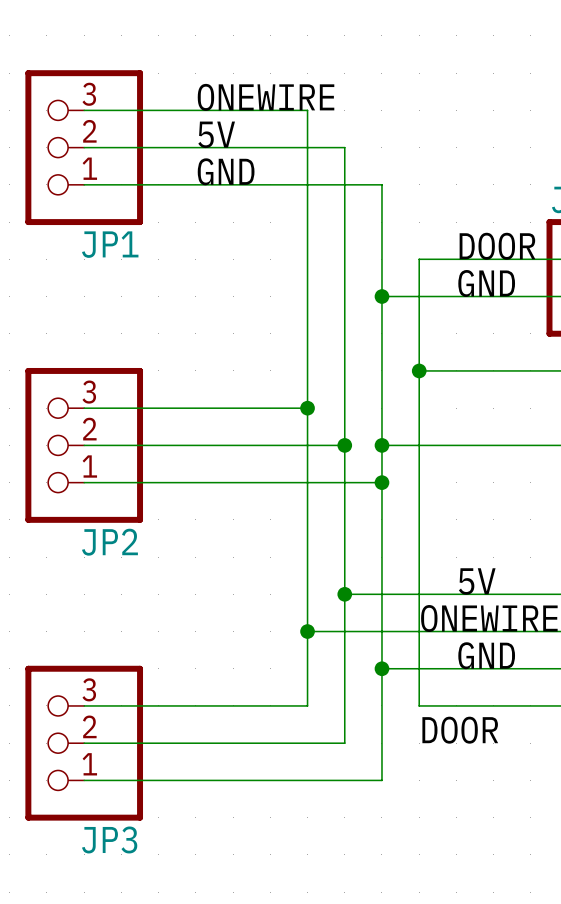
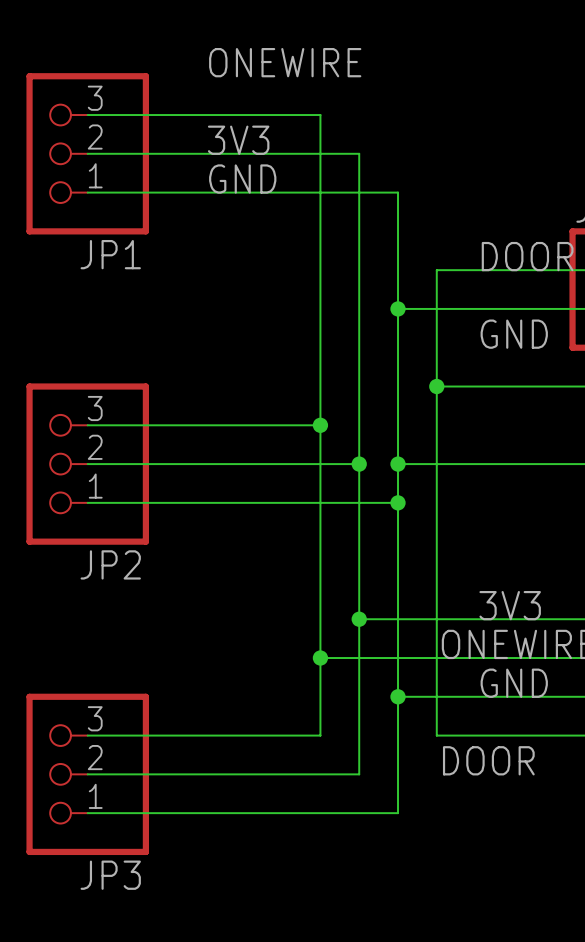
label position: ONEWIRE (266, 97) -> ONEWIRE (285, 62)
label: 5V (216, 134) -> 3V3 (238, 140)
label position: GND (486, 283) -> GND (514, 334)
label: 5V (477, 581) -> 3V3 (510, 605)

